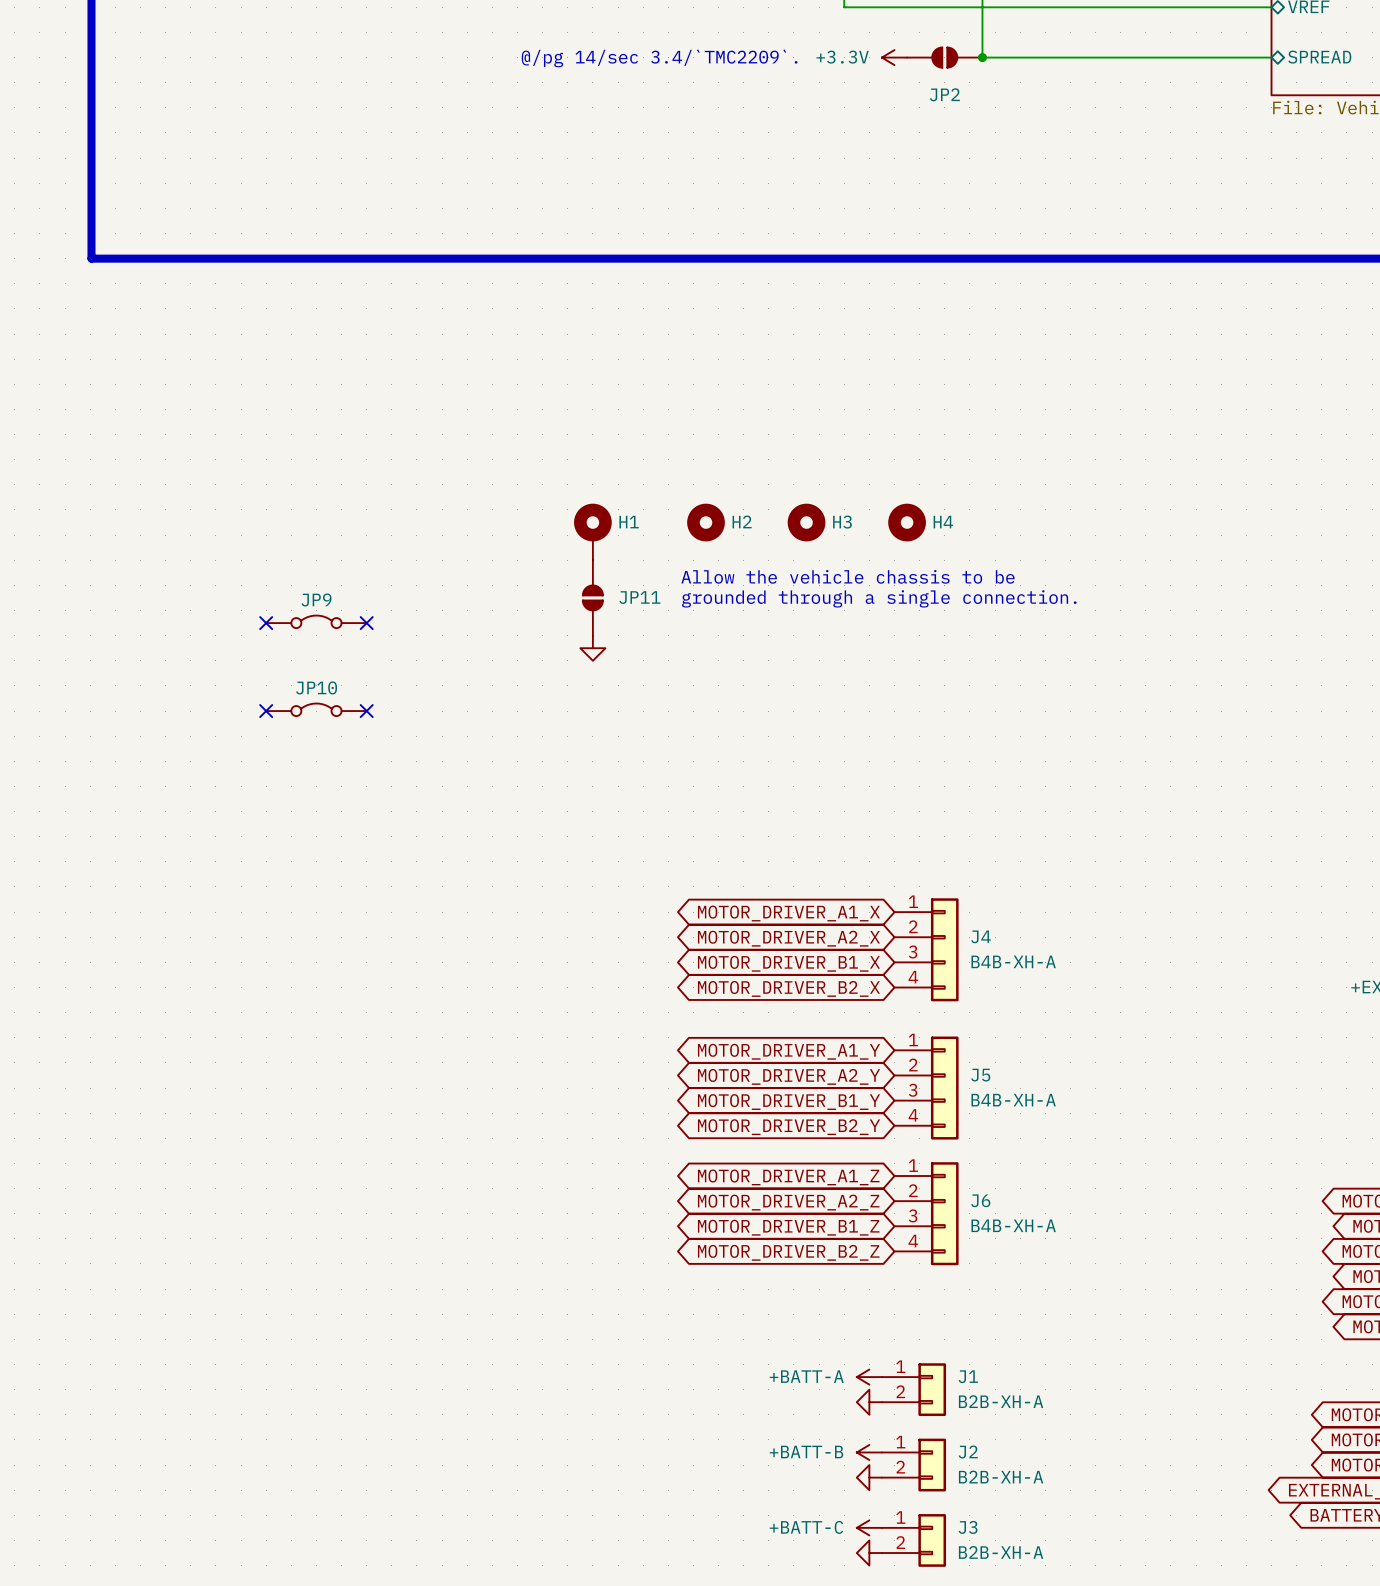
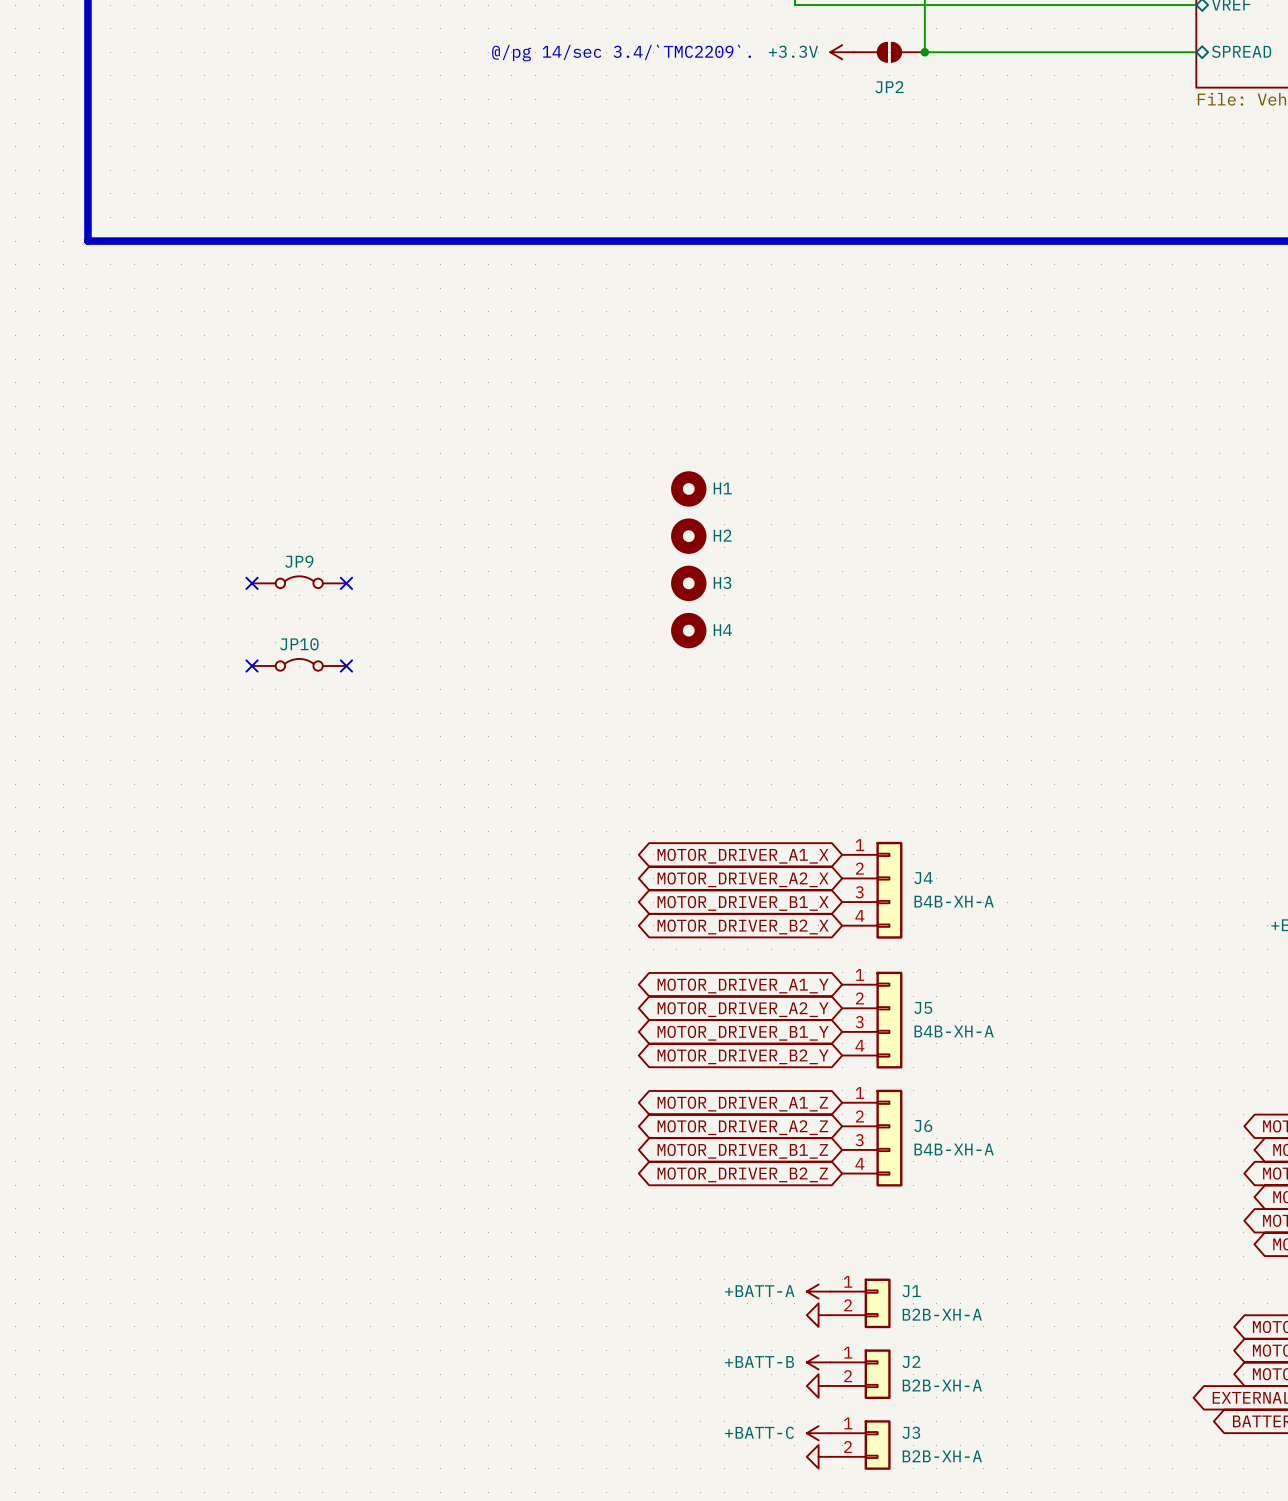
H1 symbol: [574, 503, 612, 561] -> [671, 471, 707, 507]
H2 position: (706, 522) -> (688, 536)
H3 position: (806, 522) -> (688, 583)
H4 position: (907, 522) -> (688, 630)
text: Allow the vehicle chassis to be (847, 576) -> none
JP11: (592, 597) -> none
text: grounded through a single connection. (879, 598) -> none
power symbol: (592, 648) -> none

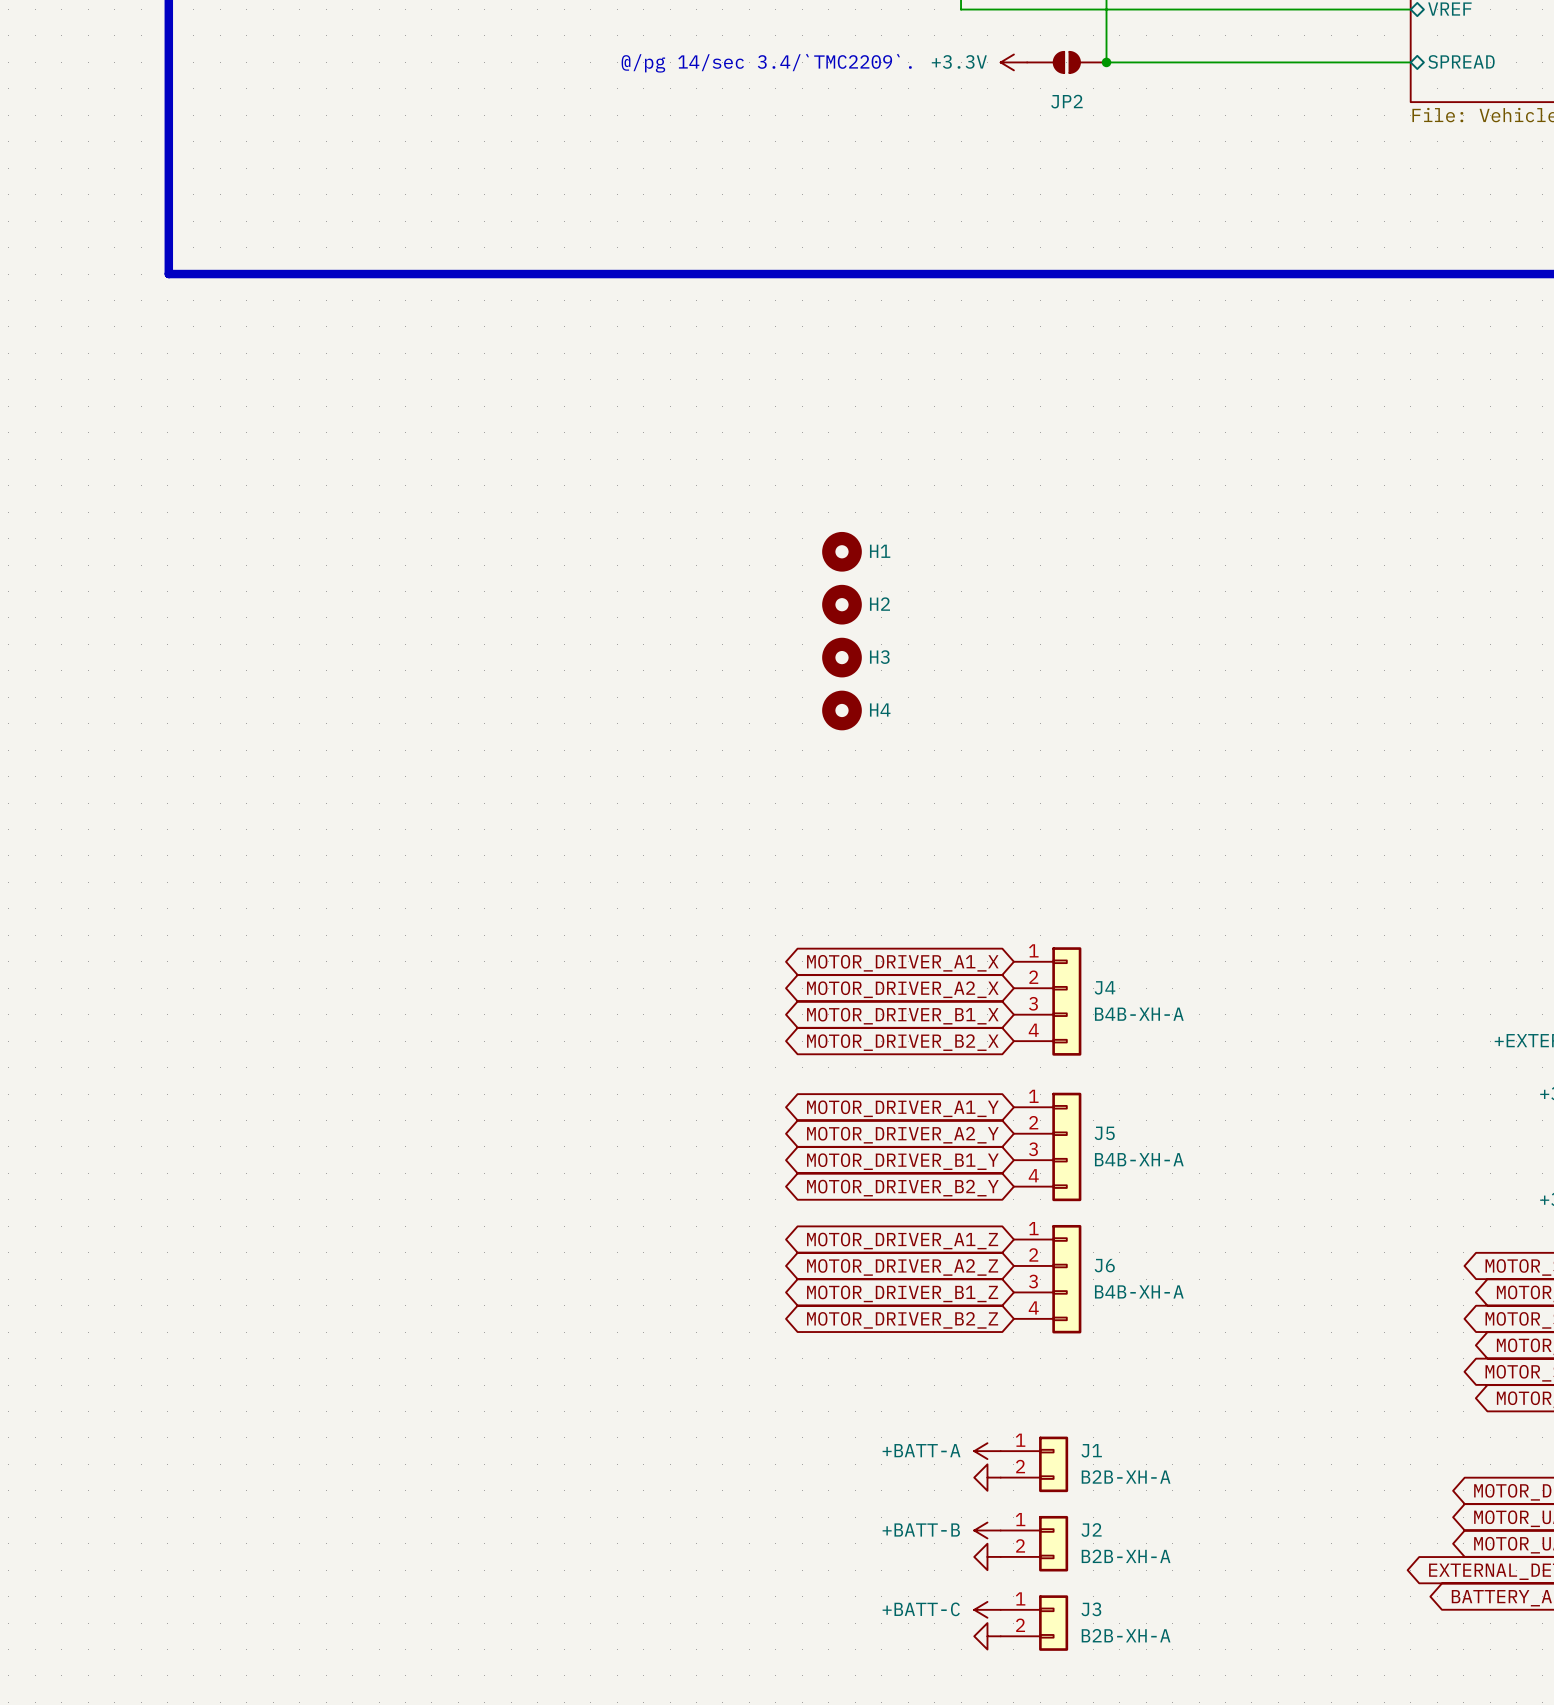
JP9: (299, 582) -> none
no-connect mark: (252, 583) -> none
no-connect mark: (346, 583) -> none
JP10: (299, 664) -> none
no-connect mark: (252, 666) -> none
no-connect mark: (346, 666) -> none

